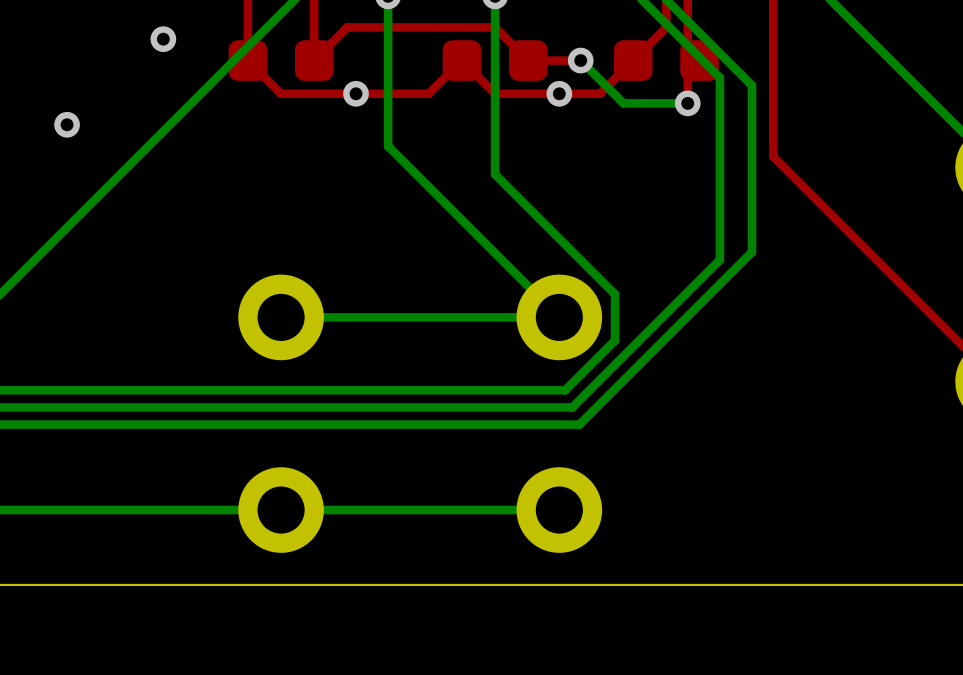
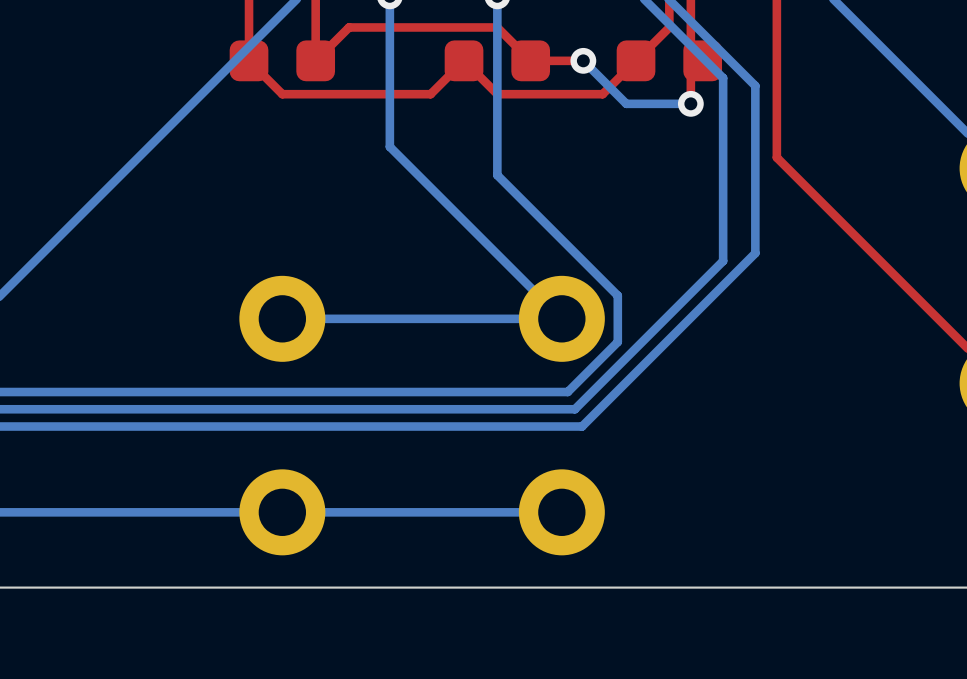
via: (163, 39) -> none
via: (356, 93) -> none
via: (559, 93) -> none
via: (67, 124) -> none

